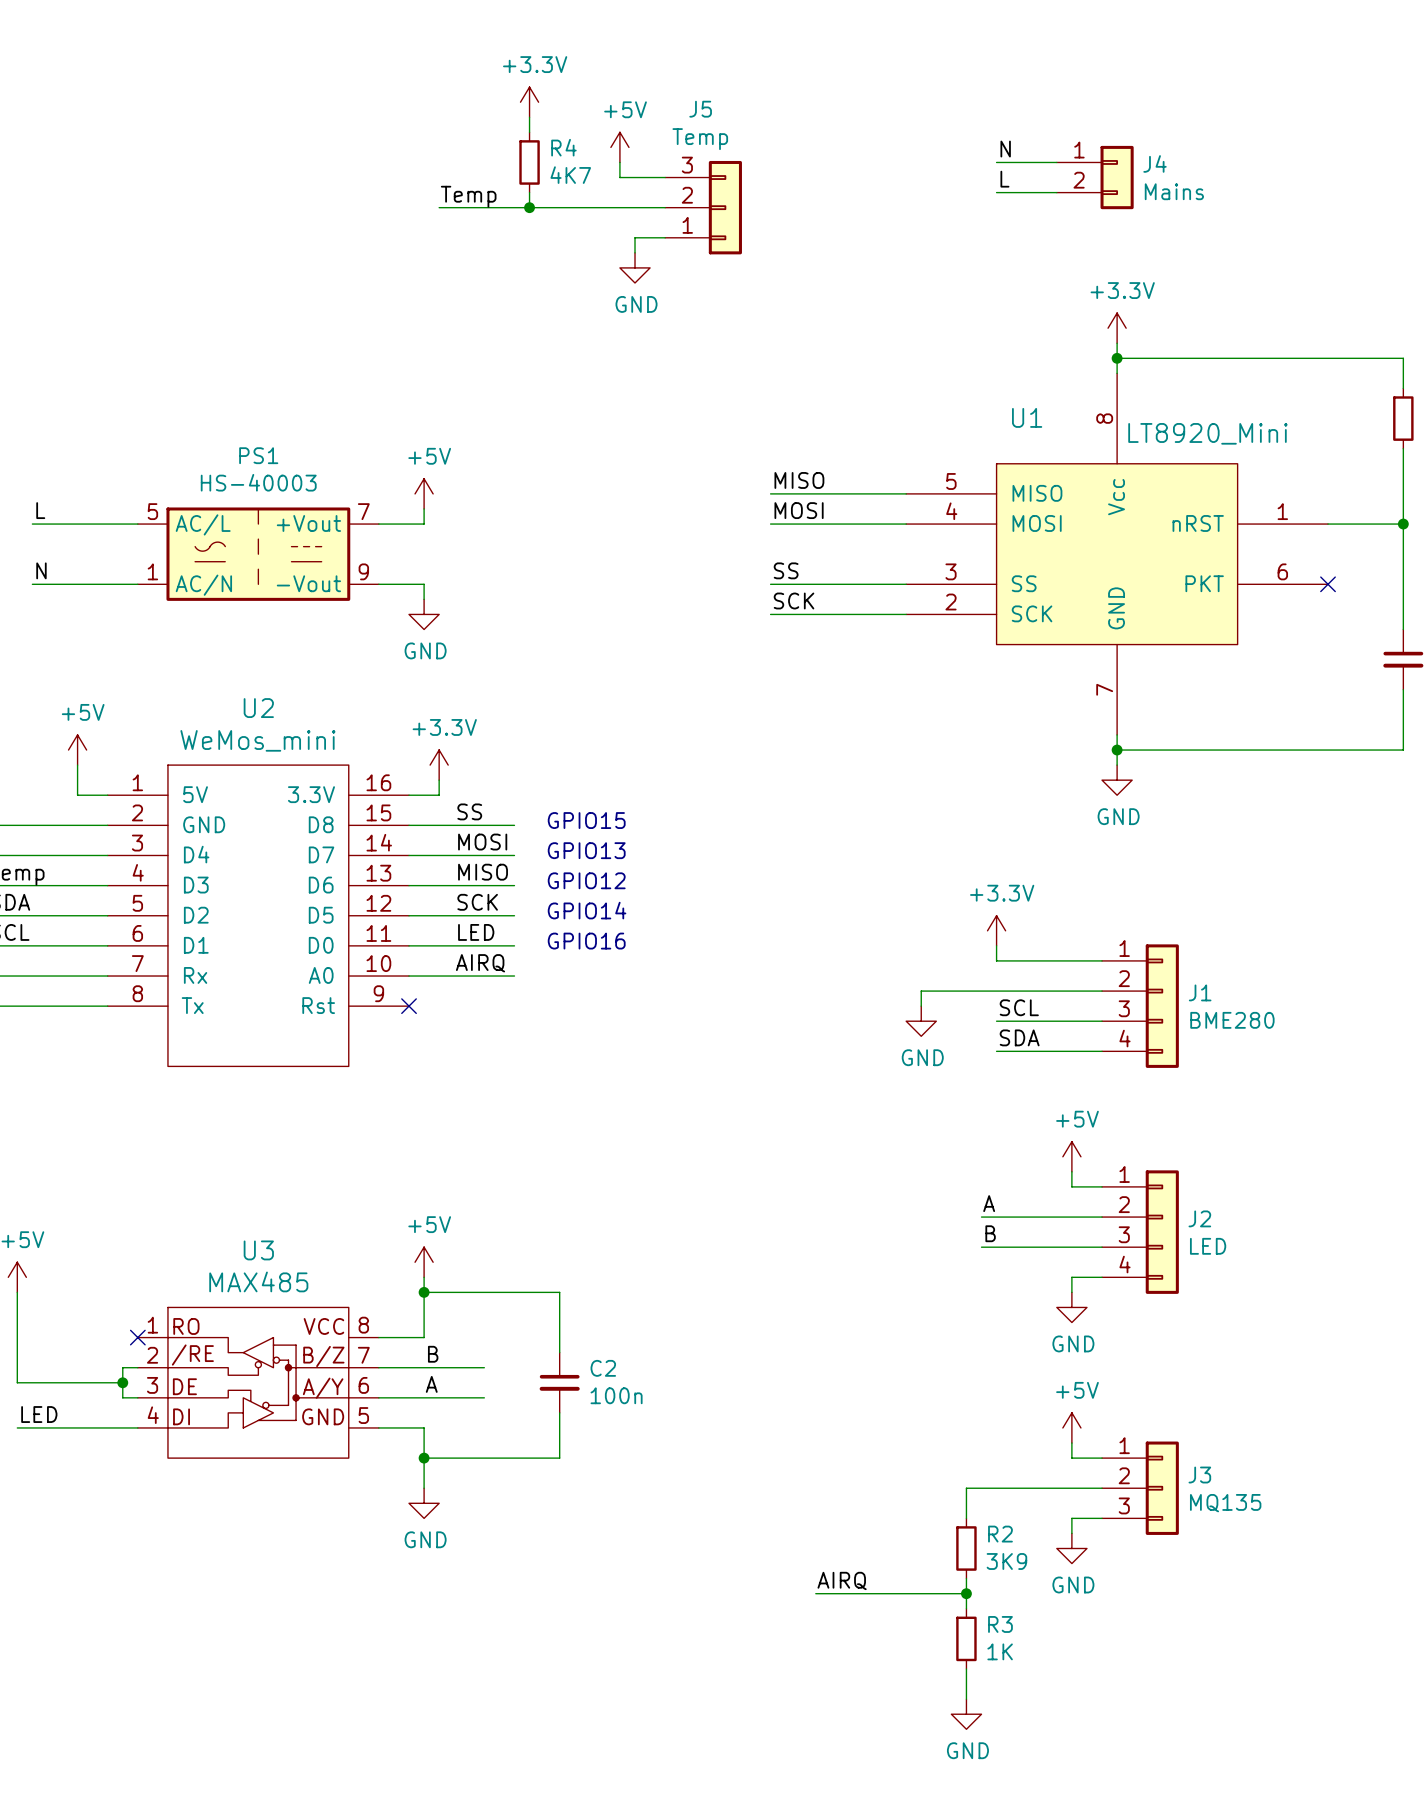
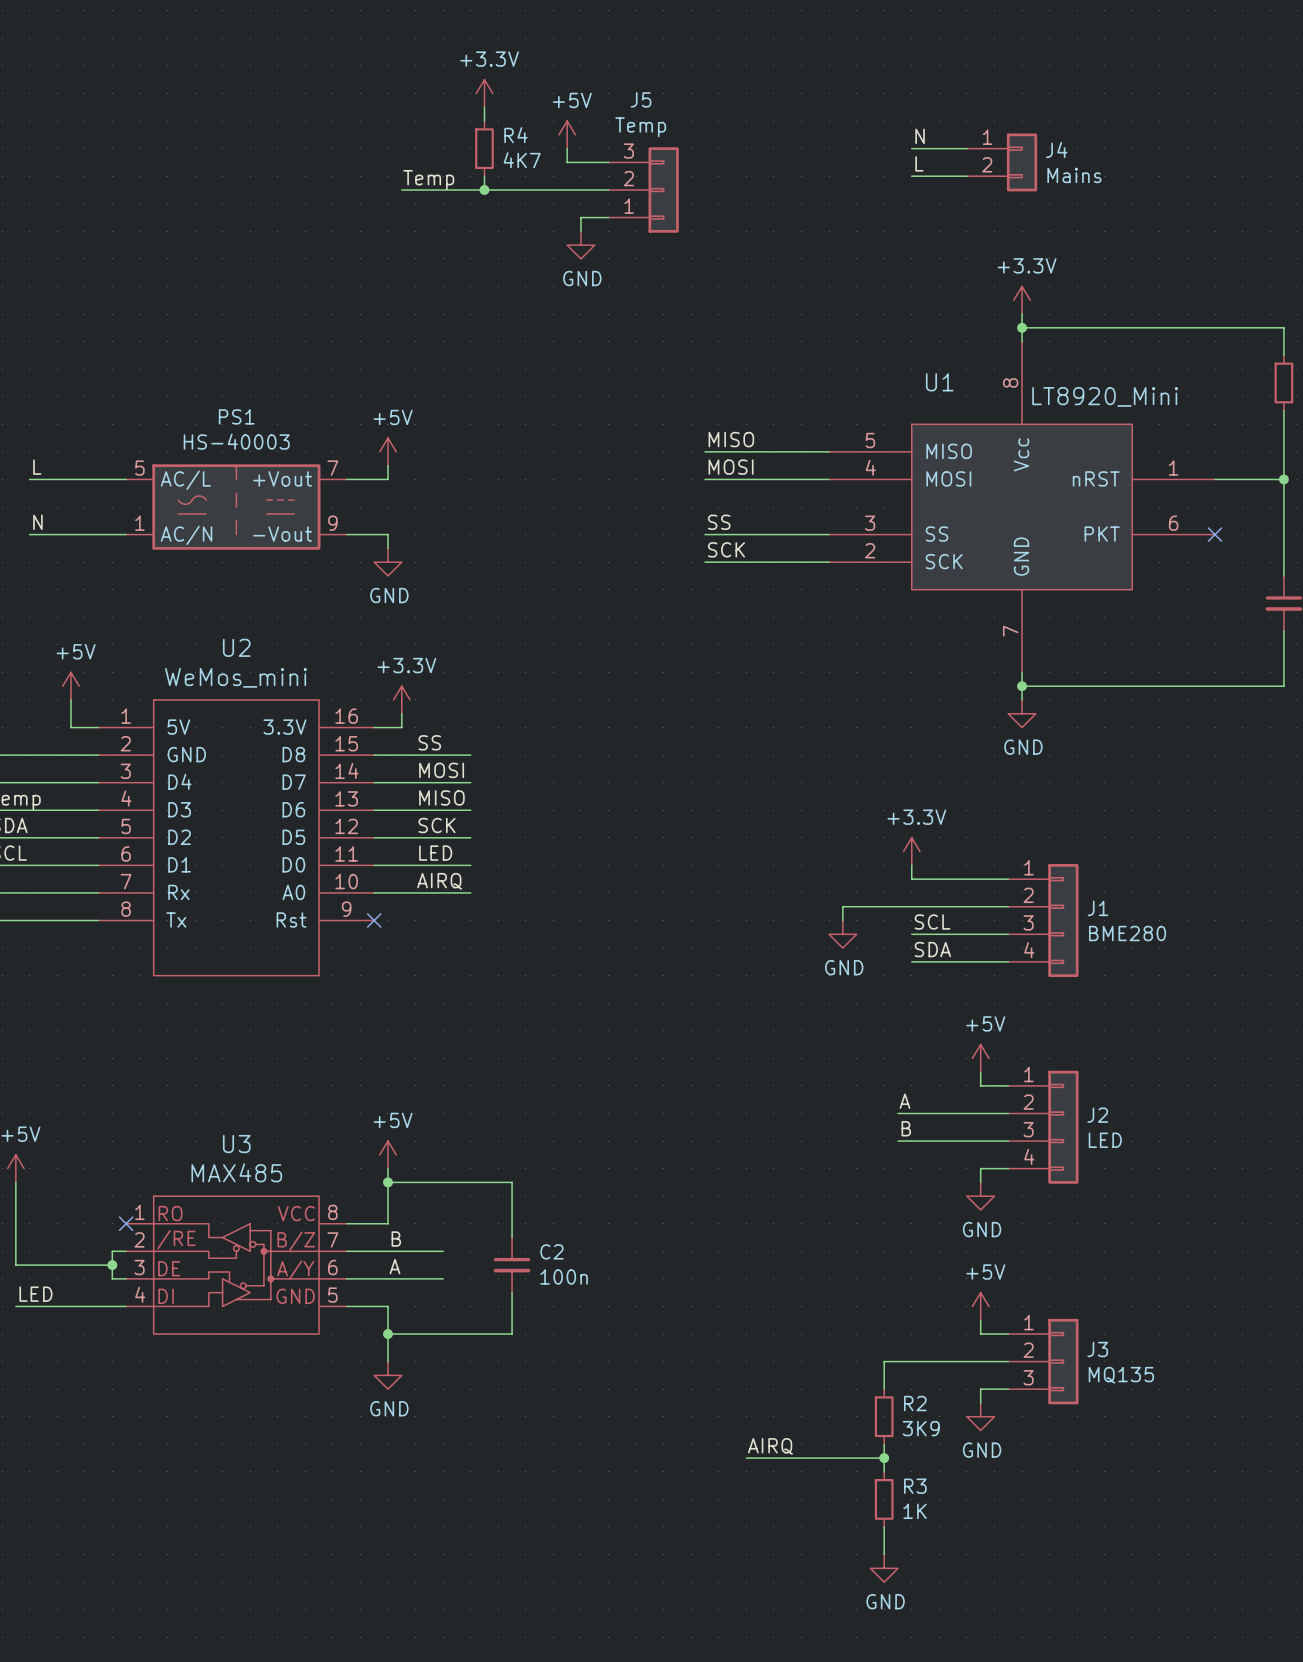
text: GPIO15 (586, 820) -> none
text: GPIO13 (586, 850) -> none
text: GPIO12 (586, 880) -> none
text: GPIO14 (587, 910) -> none
text: GPIO16 (586, 941) -> none

